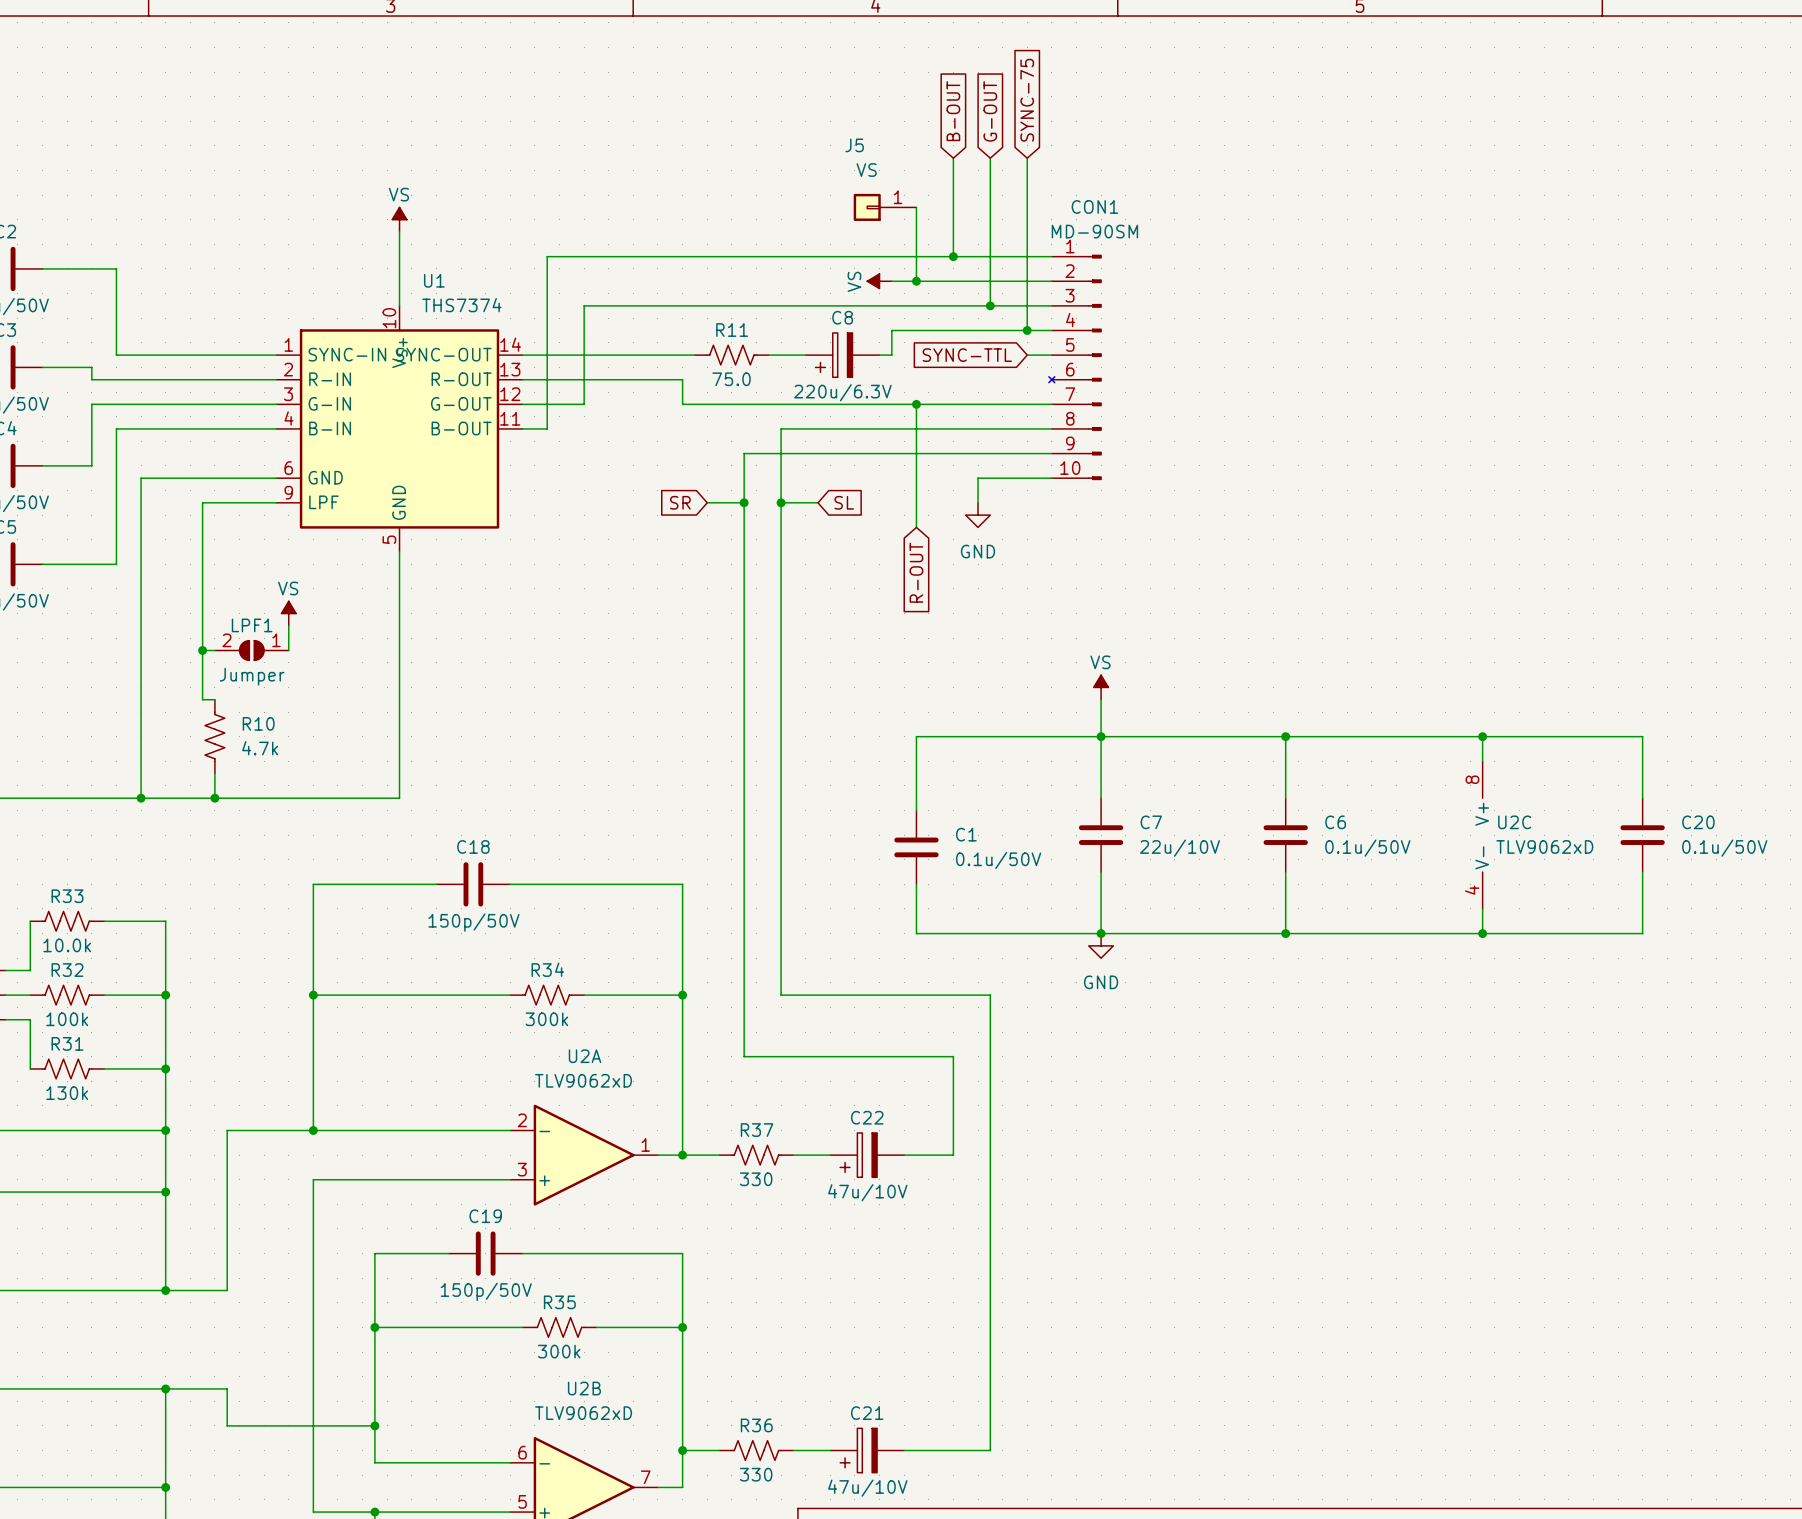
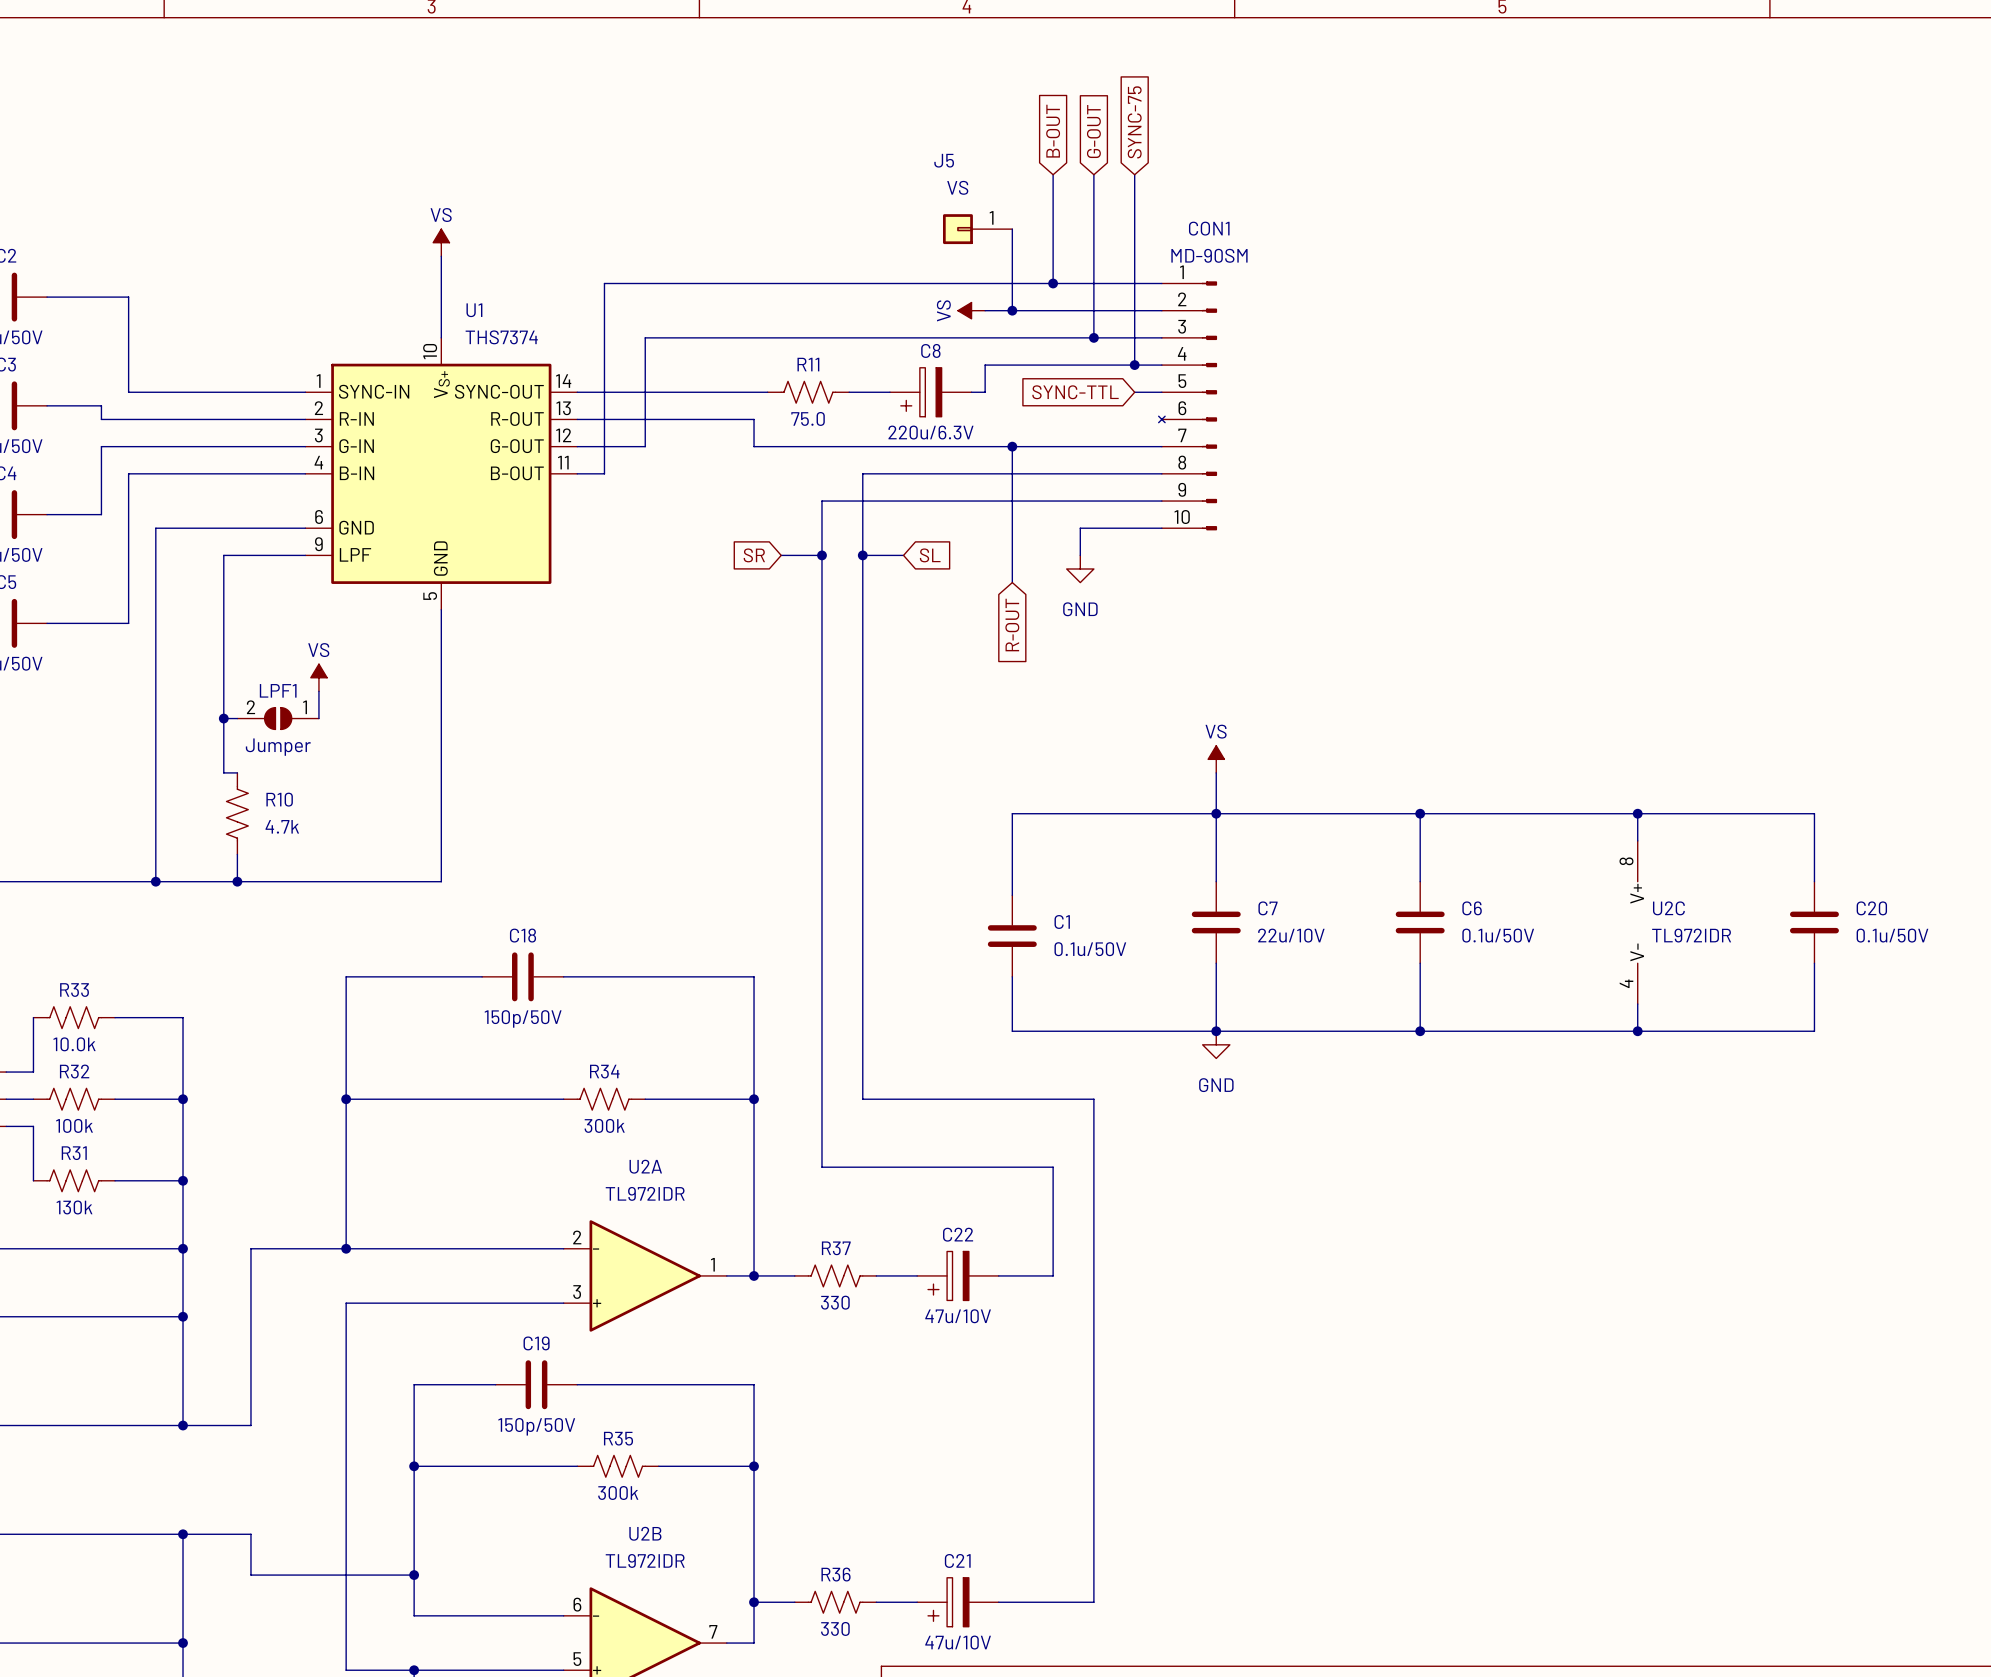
U2C value: TLV9062xD (1544, 846) -> TL972IDR (1691, 935)
U2A value: TLV9062xD (583, 1080) -> TL972IDR (645, 1193)
U2B value: TLV9062xD (583, 1413) -> TL972IDR (645, 1560)

